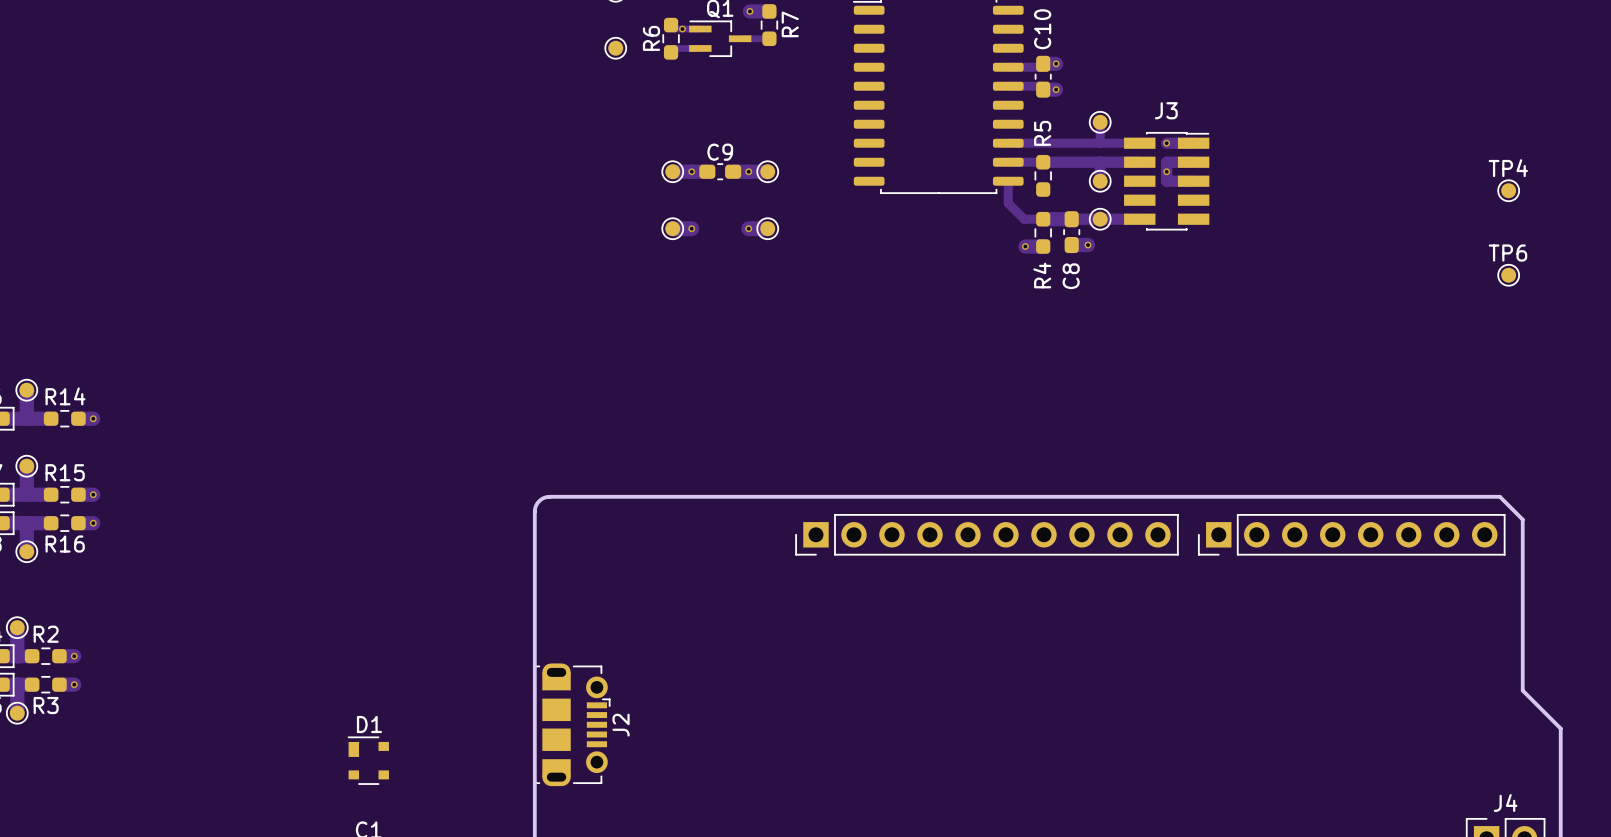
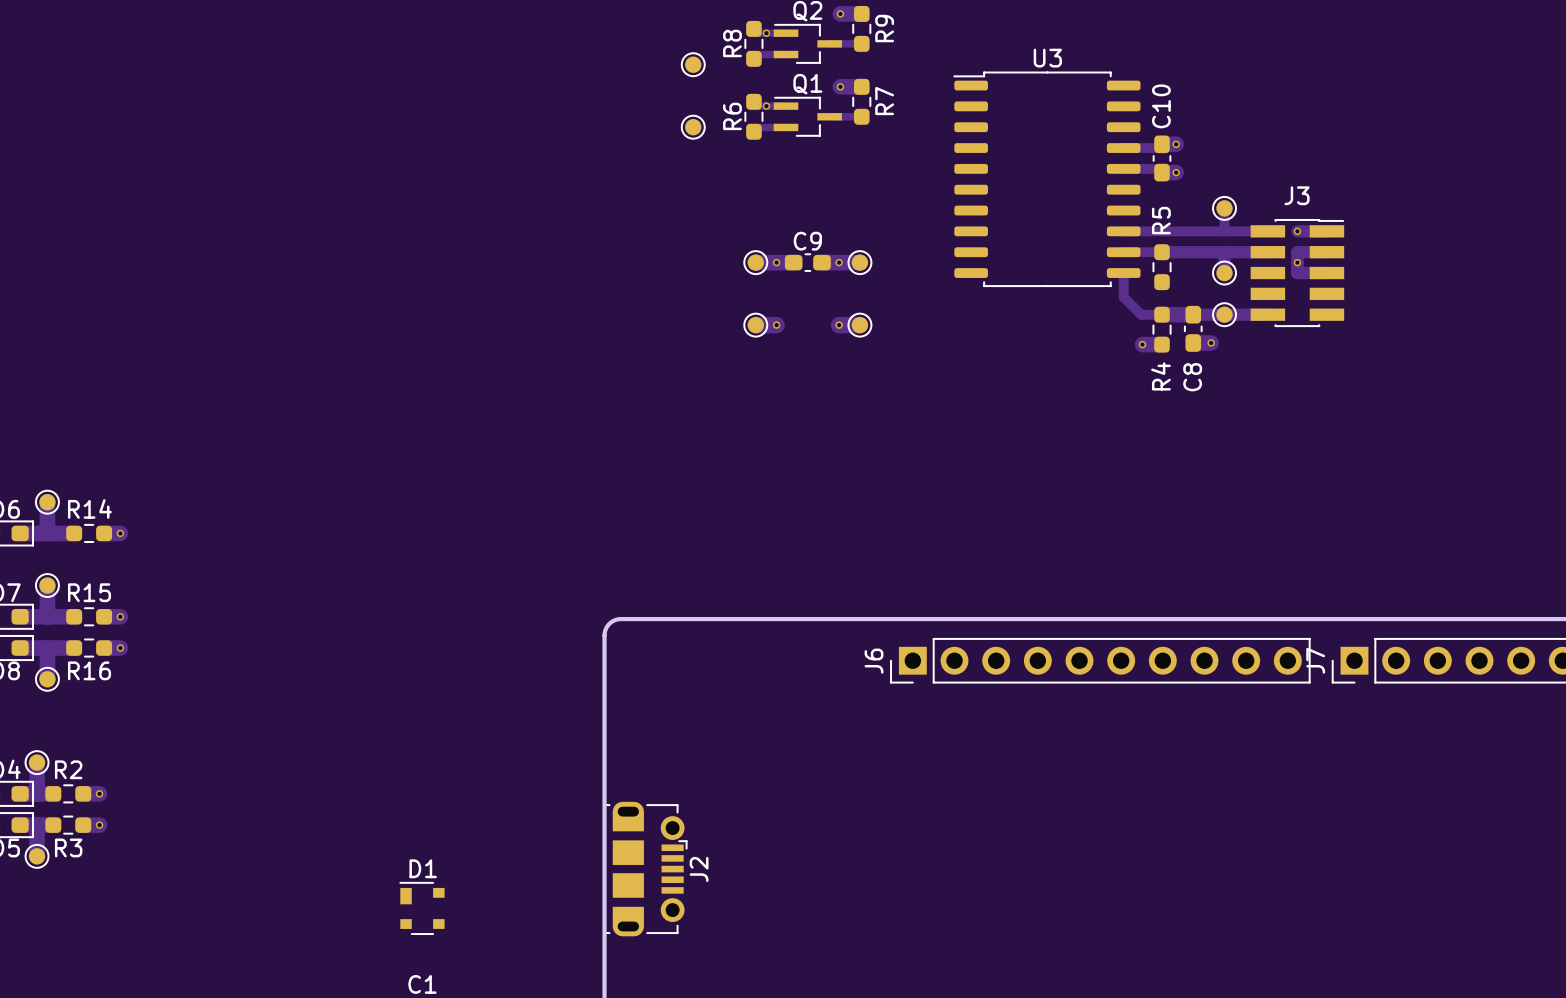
J7 name: none -> J7 (1315, 660)
J6 name: none -> J6 (874, 661)

